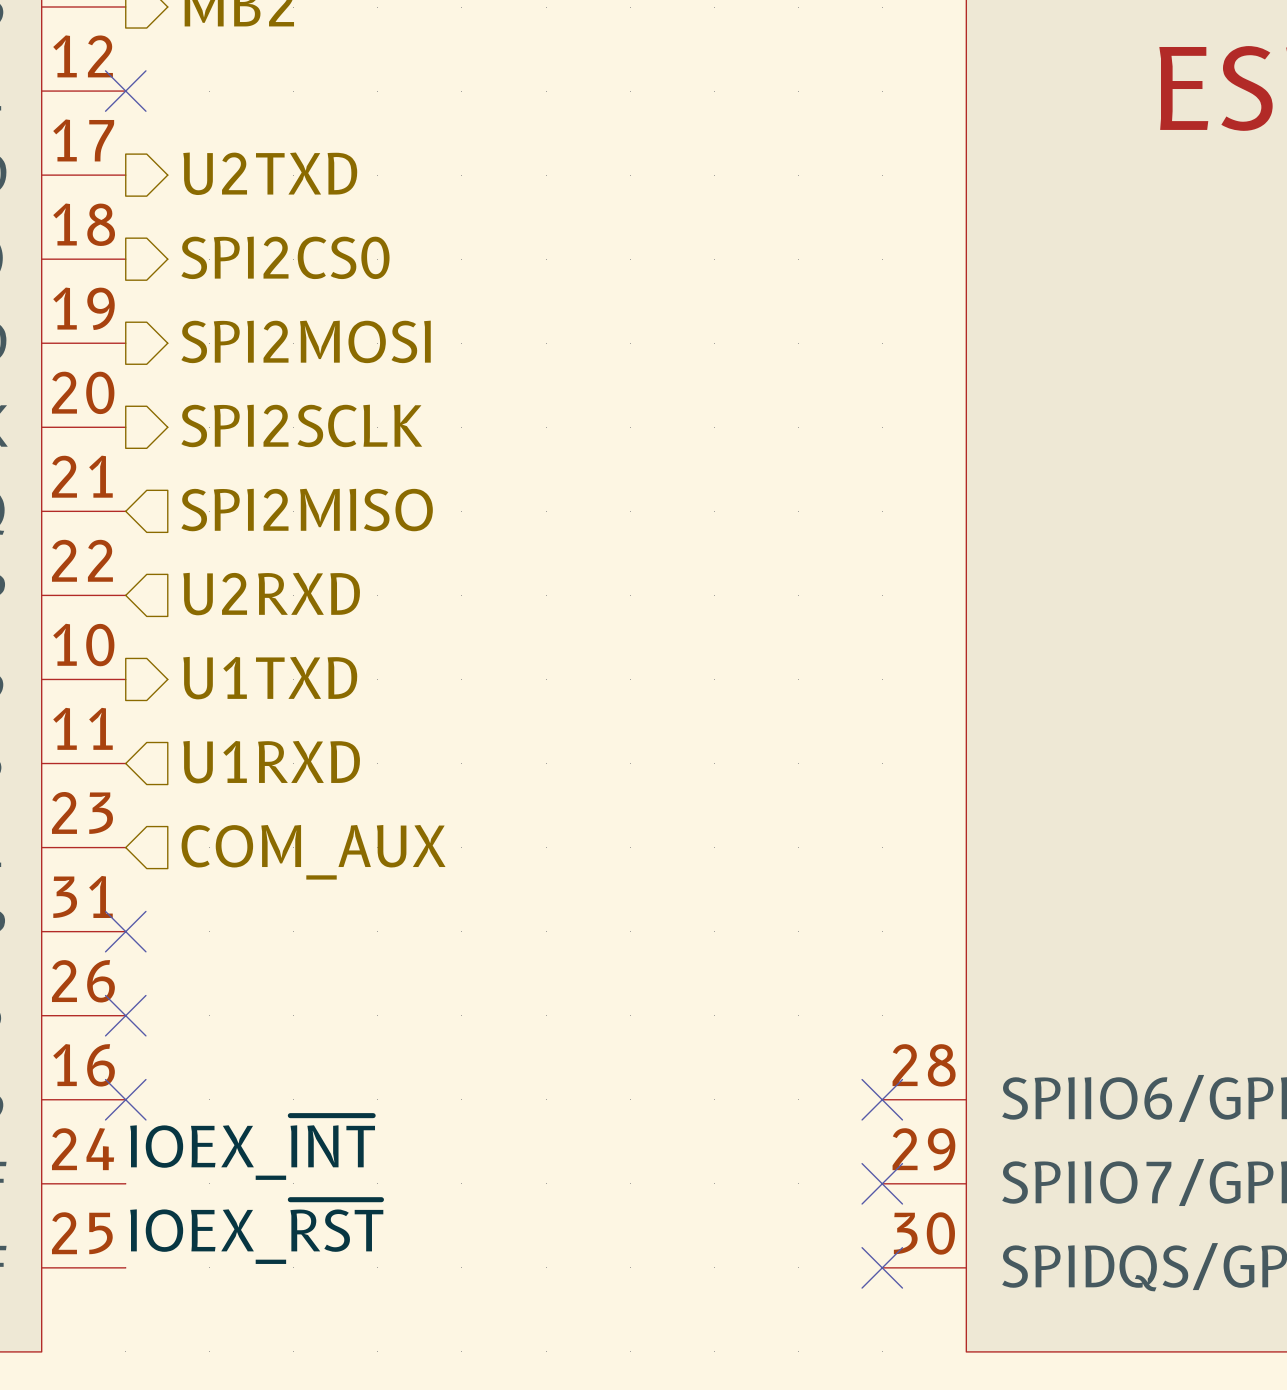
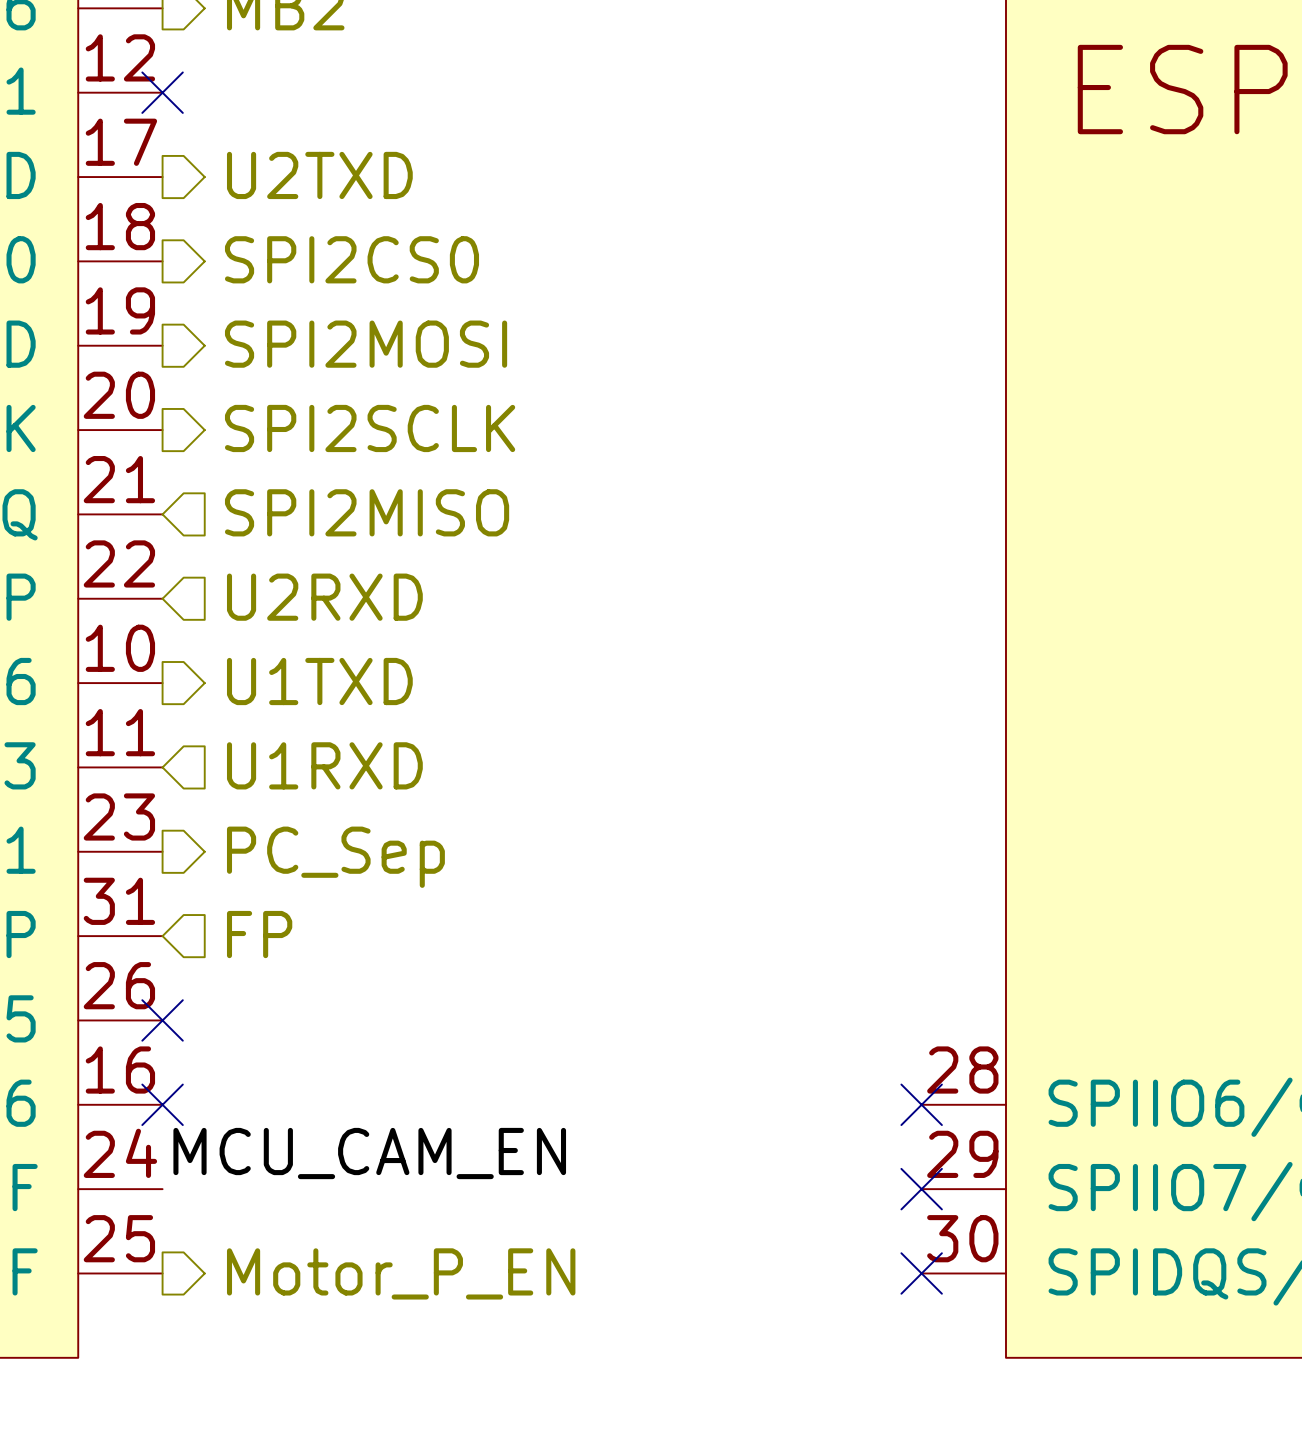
hierarchical label shape: input (313, 852) -> output (335, 857)
hierarchical label: COM_AUX (313, 852) -> PC_Sep (335, 857)
hierarchical label: none -> FP (259, 934)
no-connect mark: (125, 931) -> none
label: IOEX_~{INT} (252, 1147) -> MCU_CAM_EN (369, 1153)
label: IOEX_~{RST} (256, 1231) -> none
hierarchical label: none -> Motor_P_EN (401, 1273)

